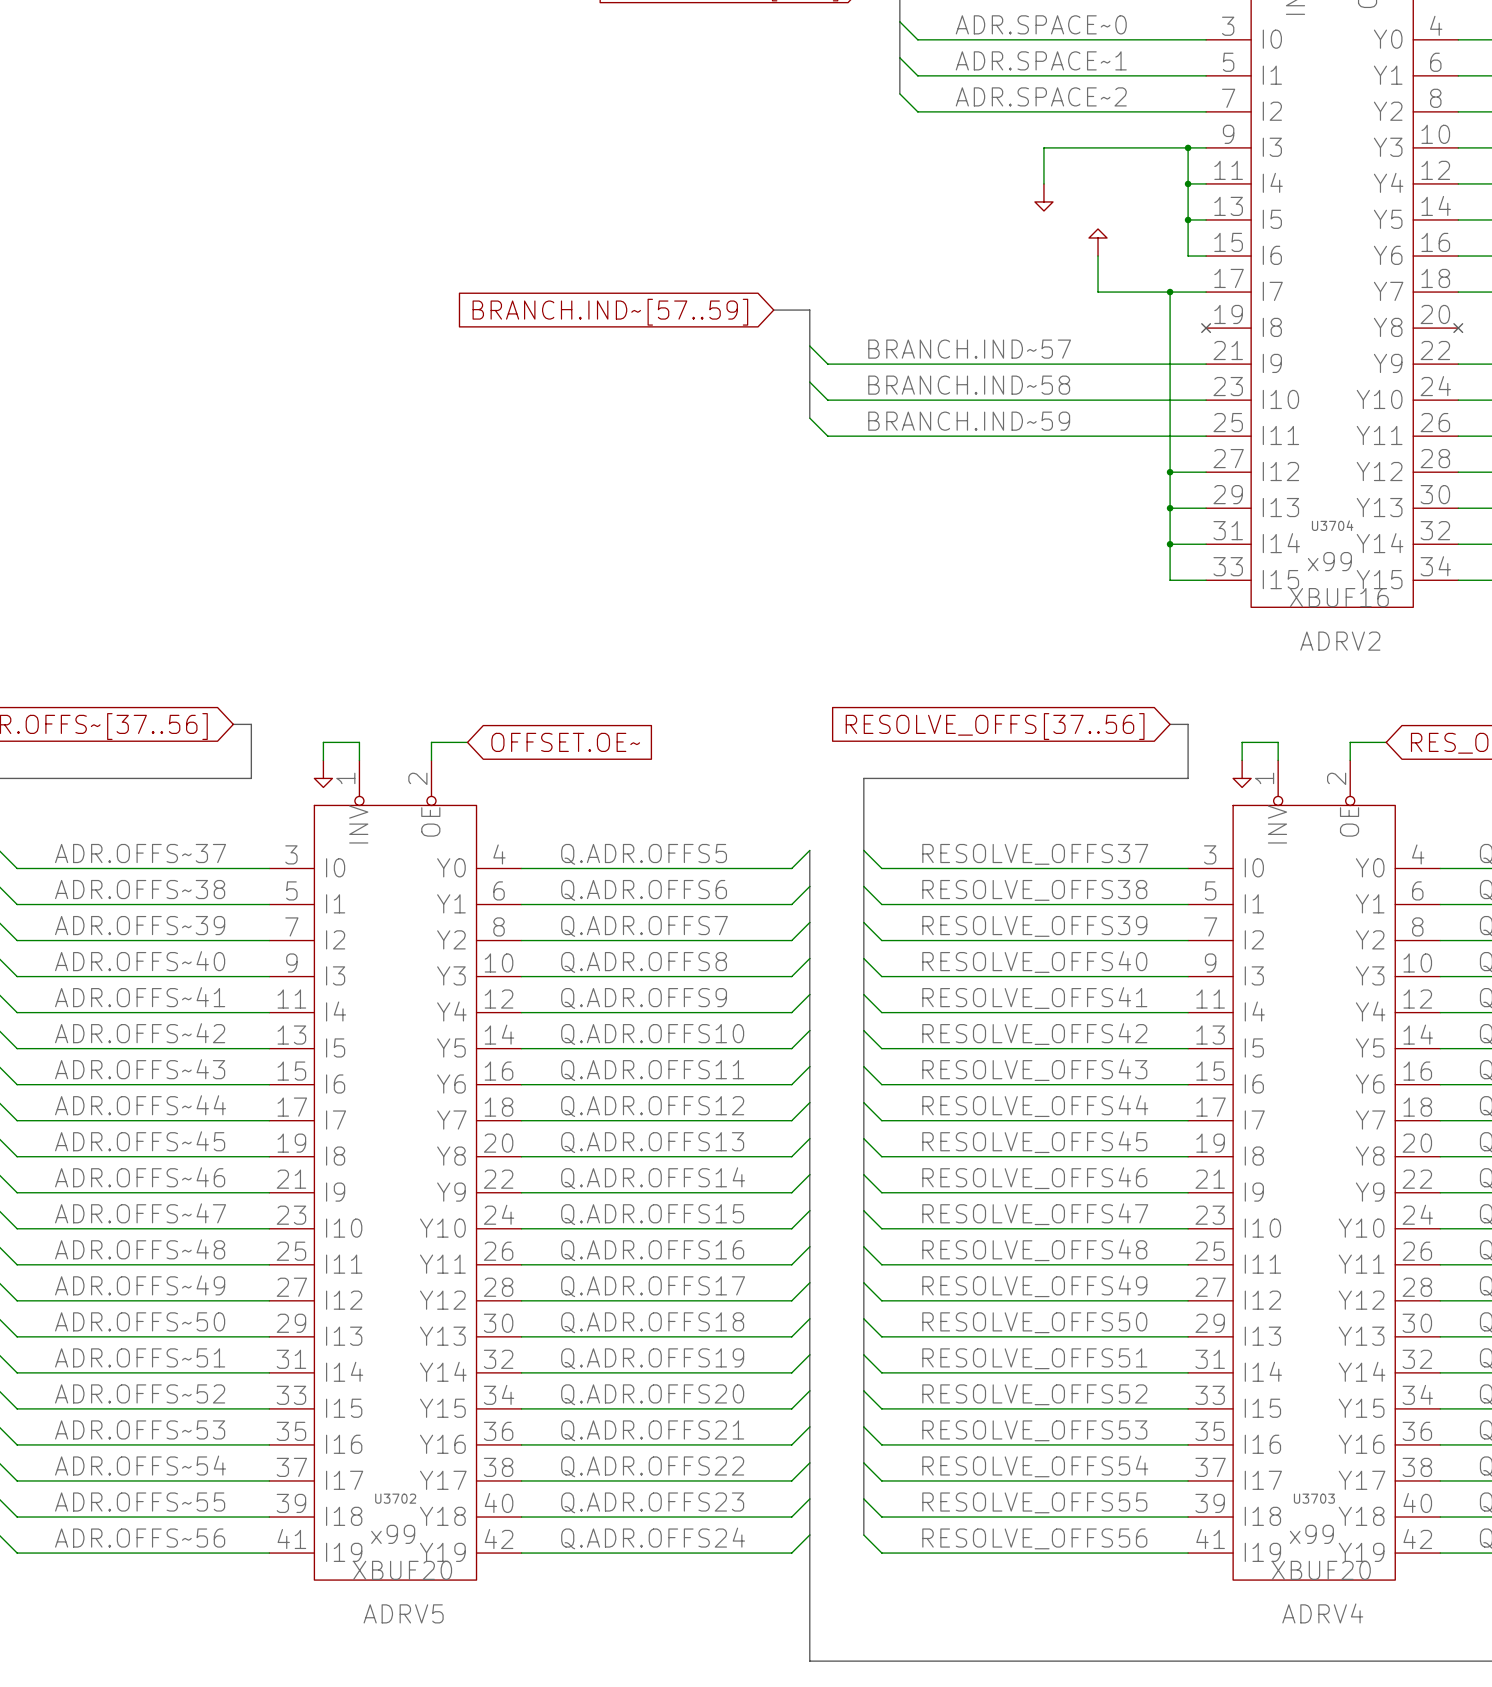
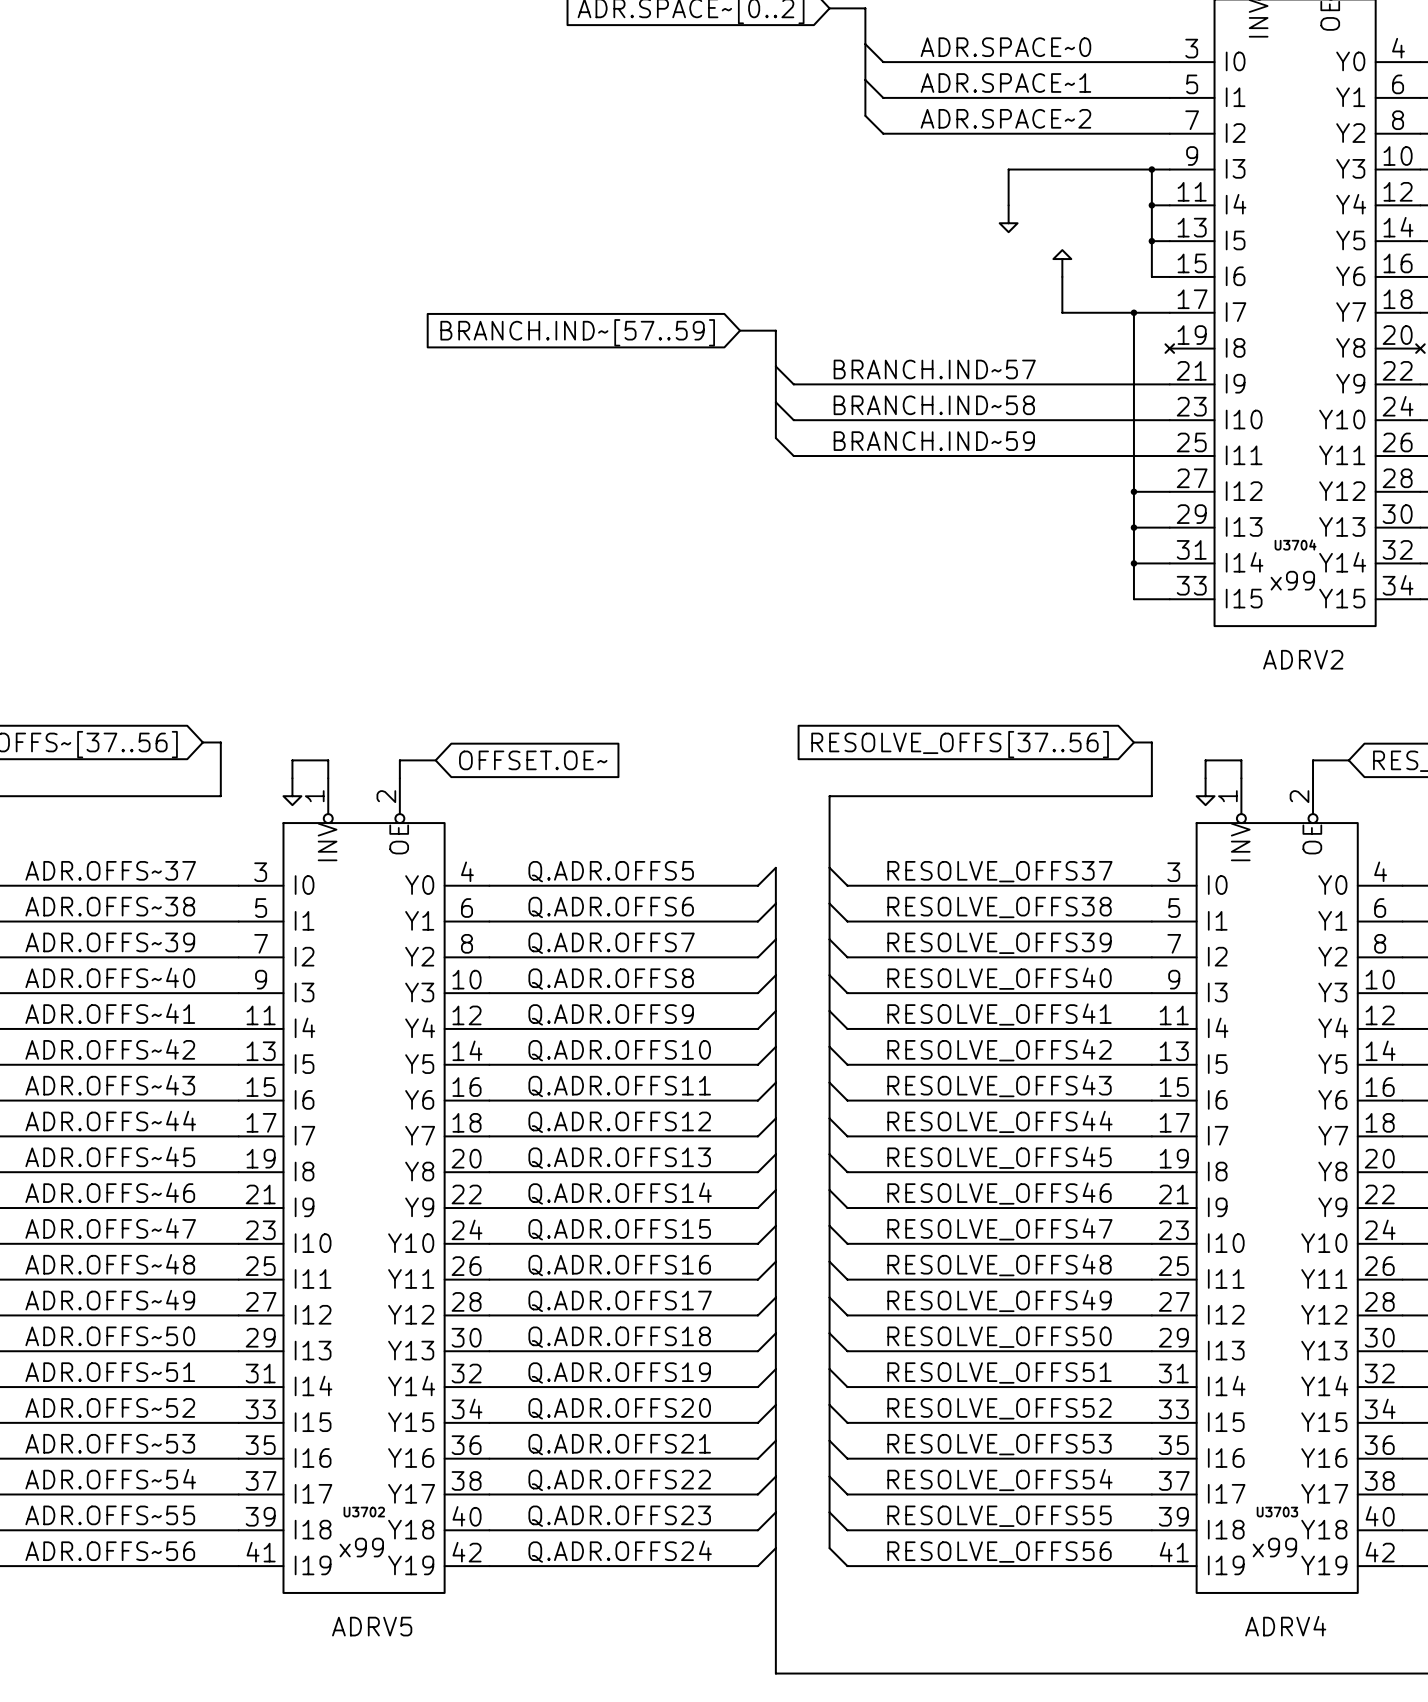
U3704 value: XBUF16 (1339, 597) -> none
U3702 value: XBUF20 (402, 1570) -> none
U3703 value: XBUF20 (1321, 1570) -> none

